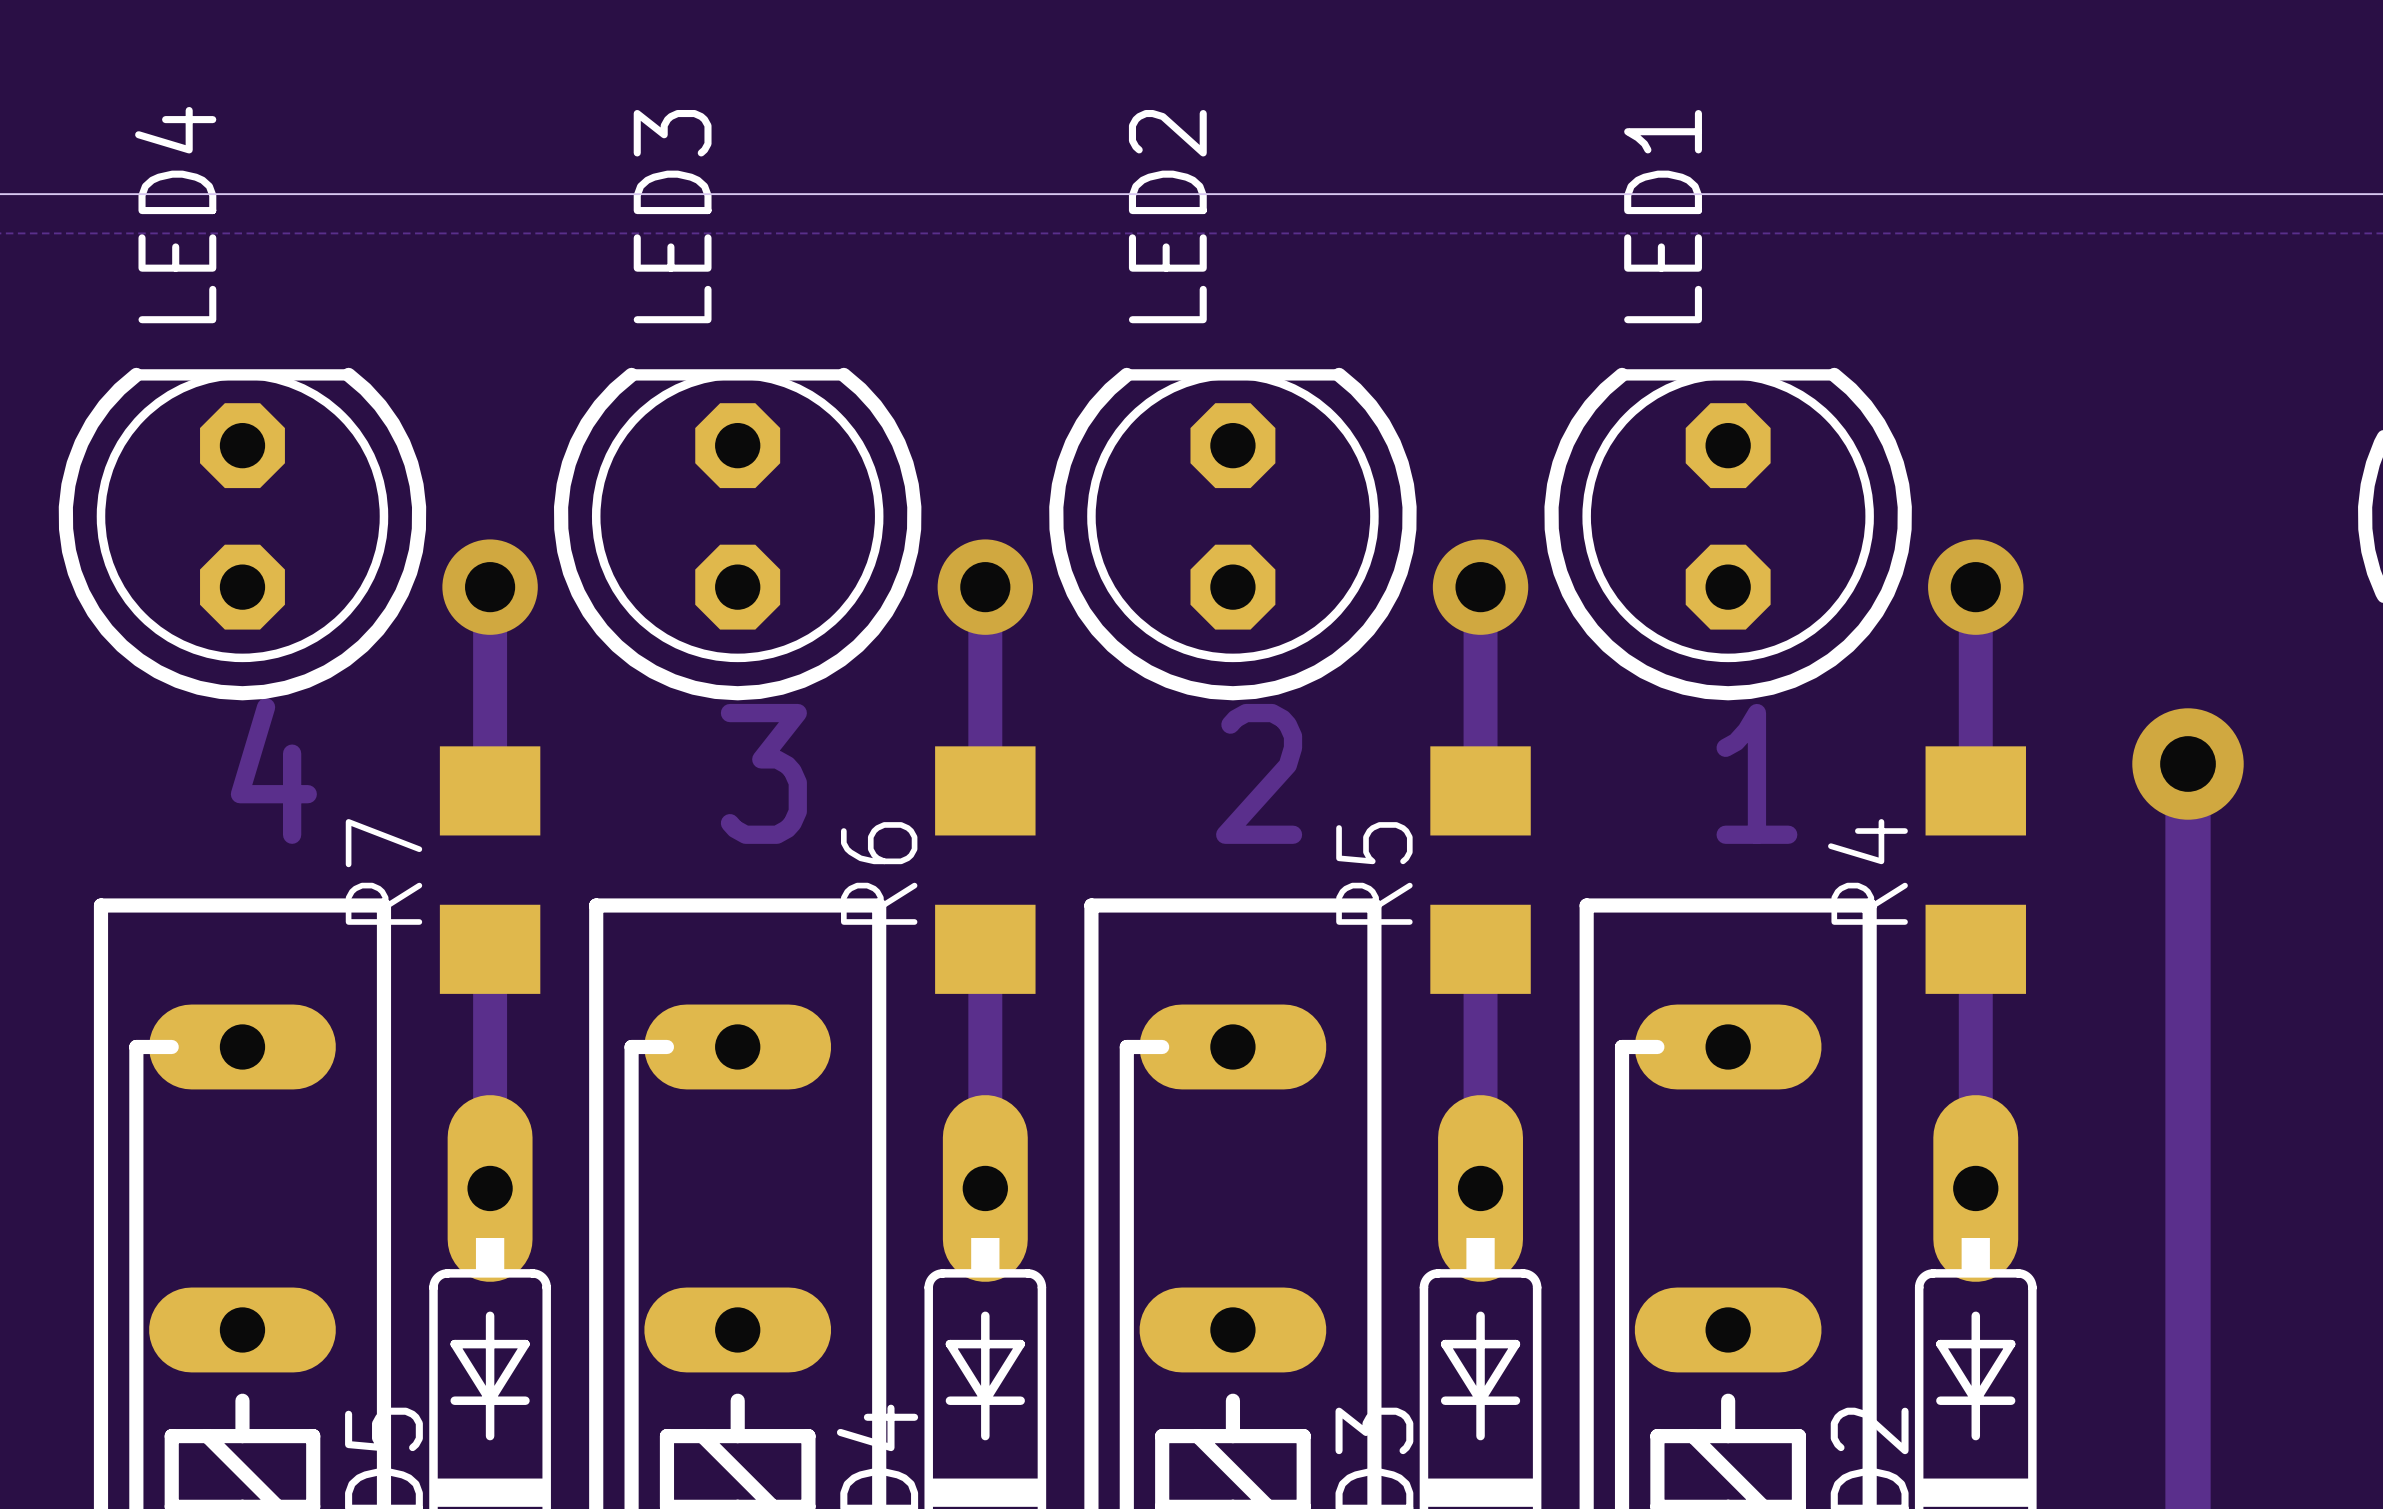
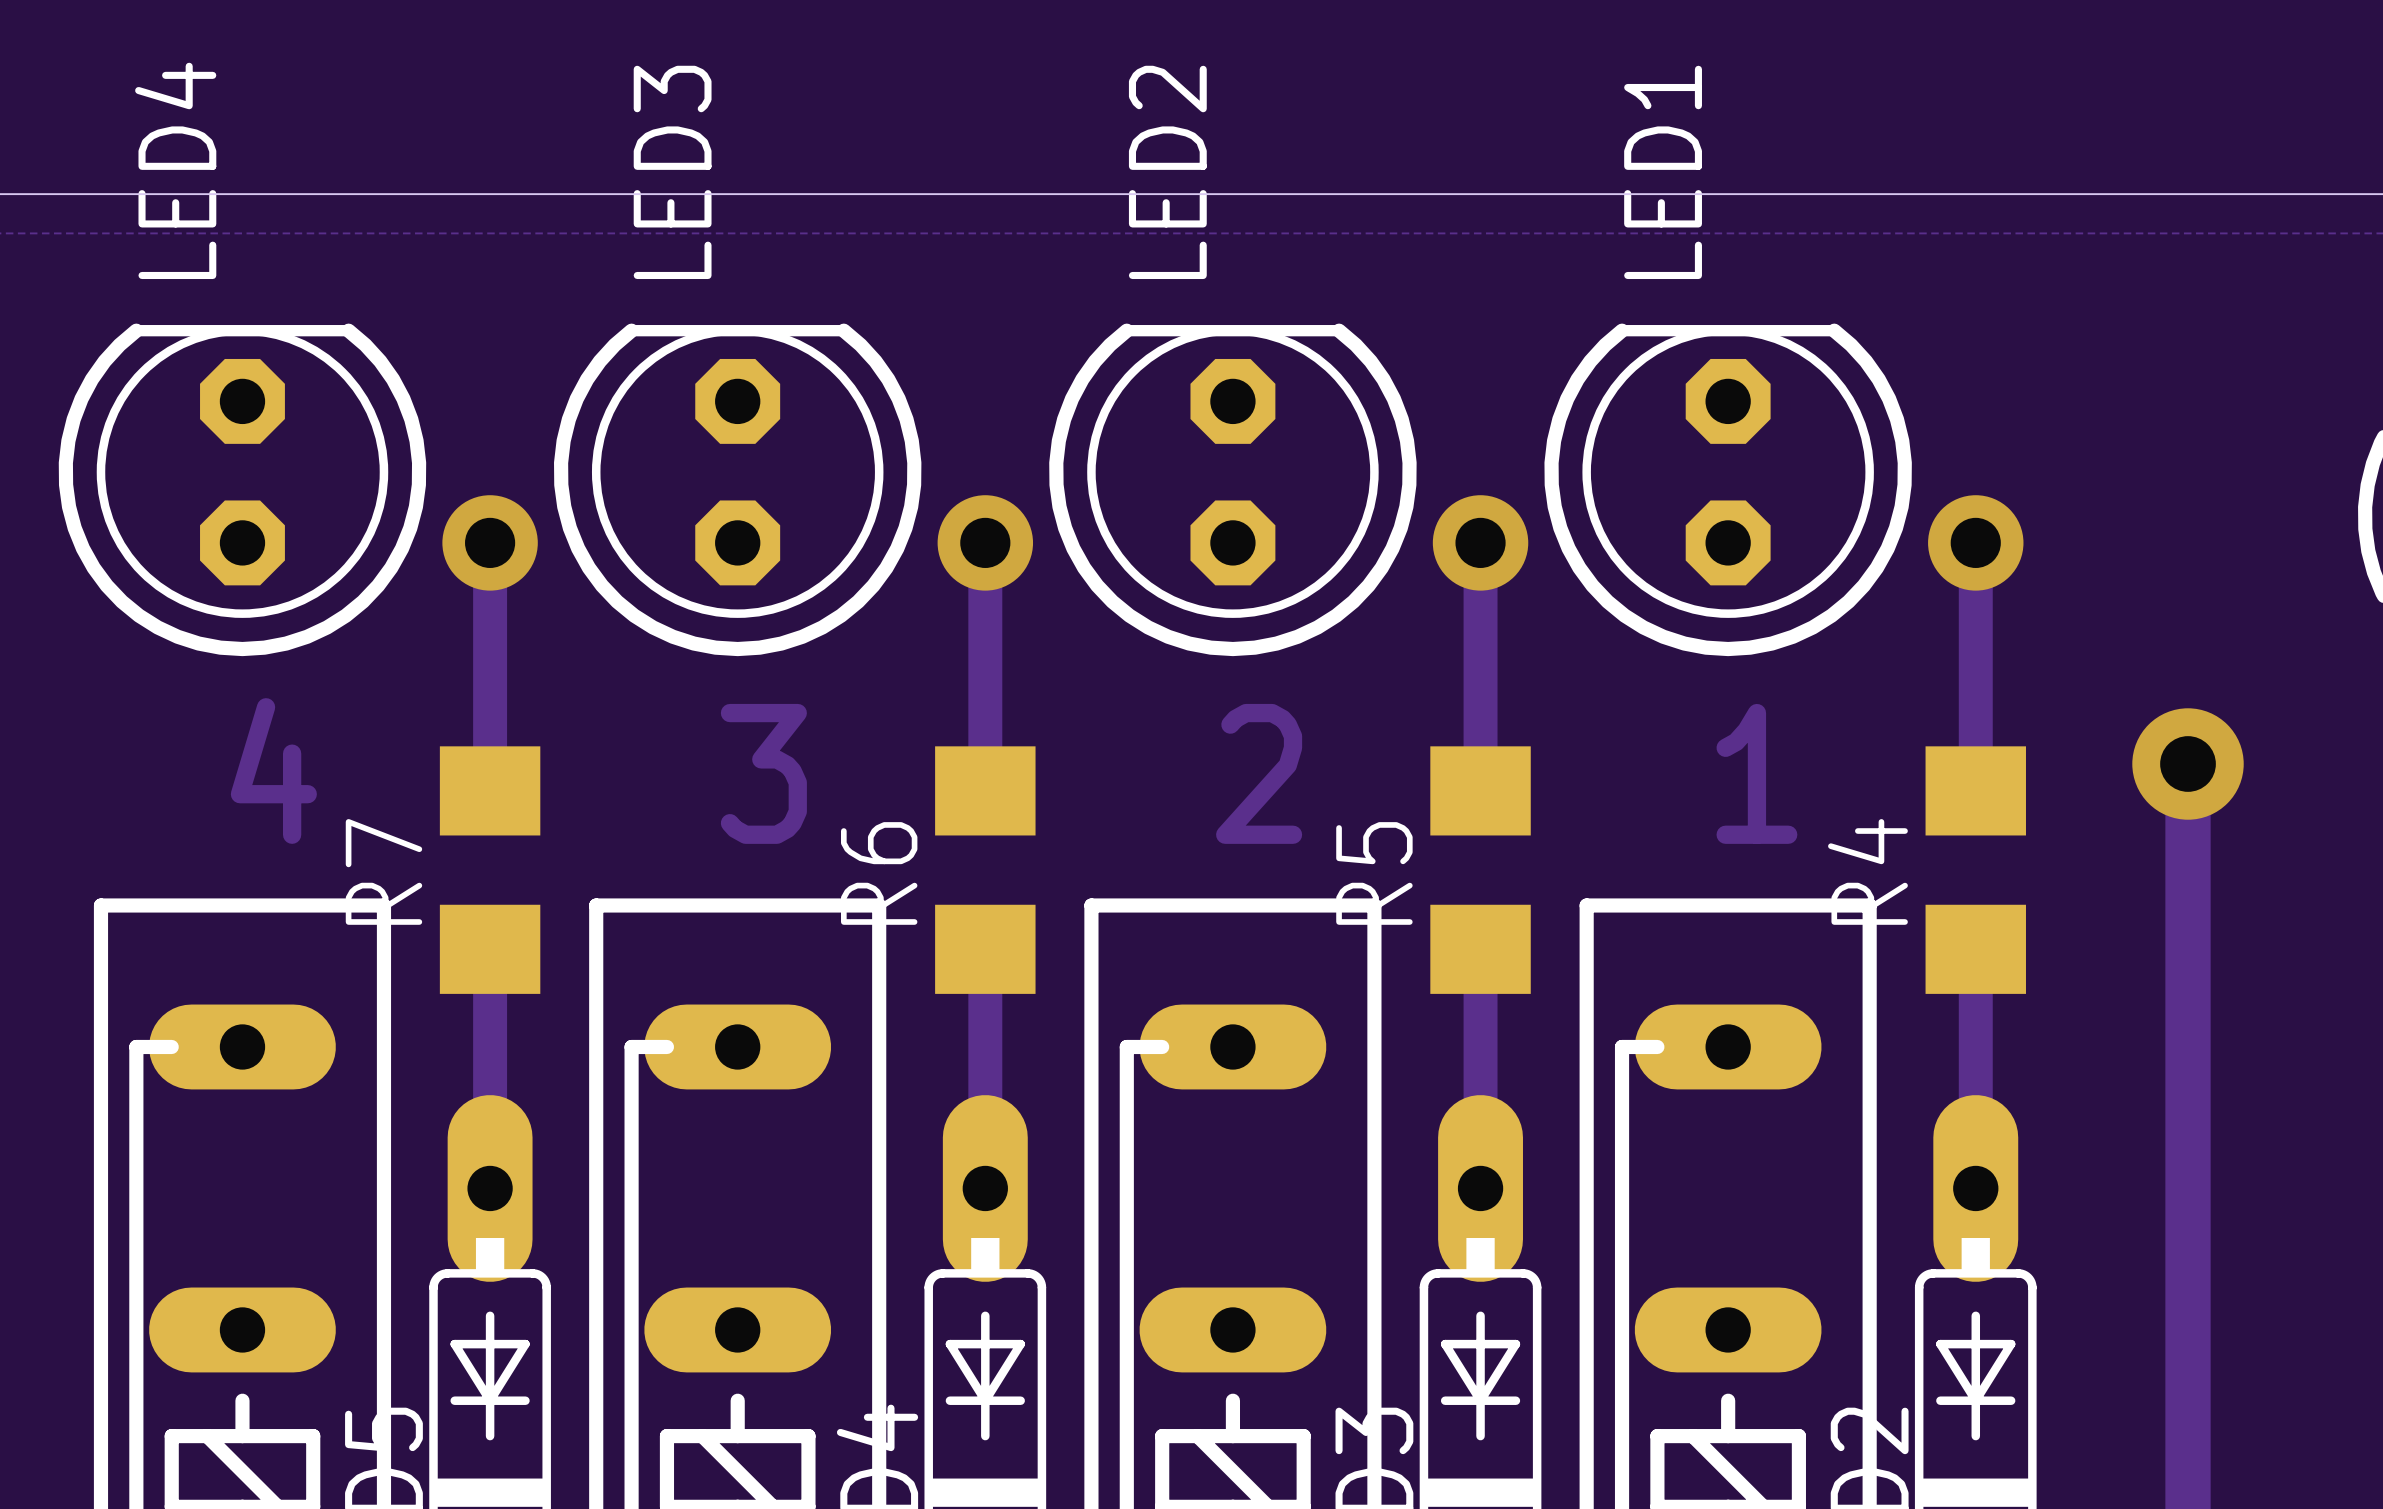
LED4 position: (242, 534) -> (242, 489)
LED3 position: (737, 534) -> (737, 489)
LED2 position: (1232, 534) -> (1232, 489)
LED1 position: (1728, 534) -> (1728, 489)
via position: (490, 587) -> (490, 542)
via position: (985, 587) -> (985, 542)
via position: (1480, 587) -> (1480, 542)
via position: (1975, 587) -> (1975, 542)

